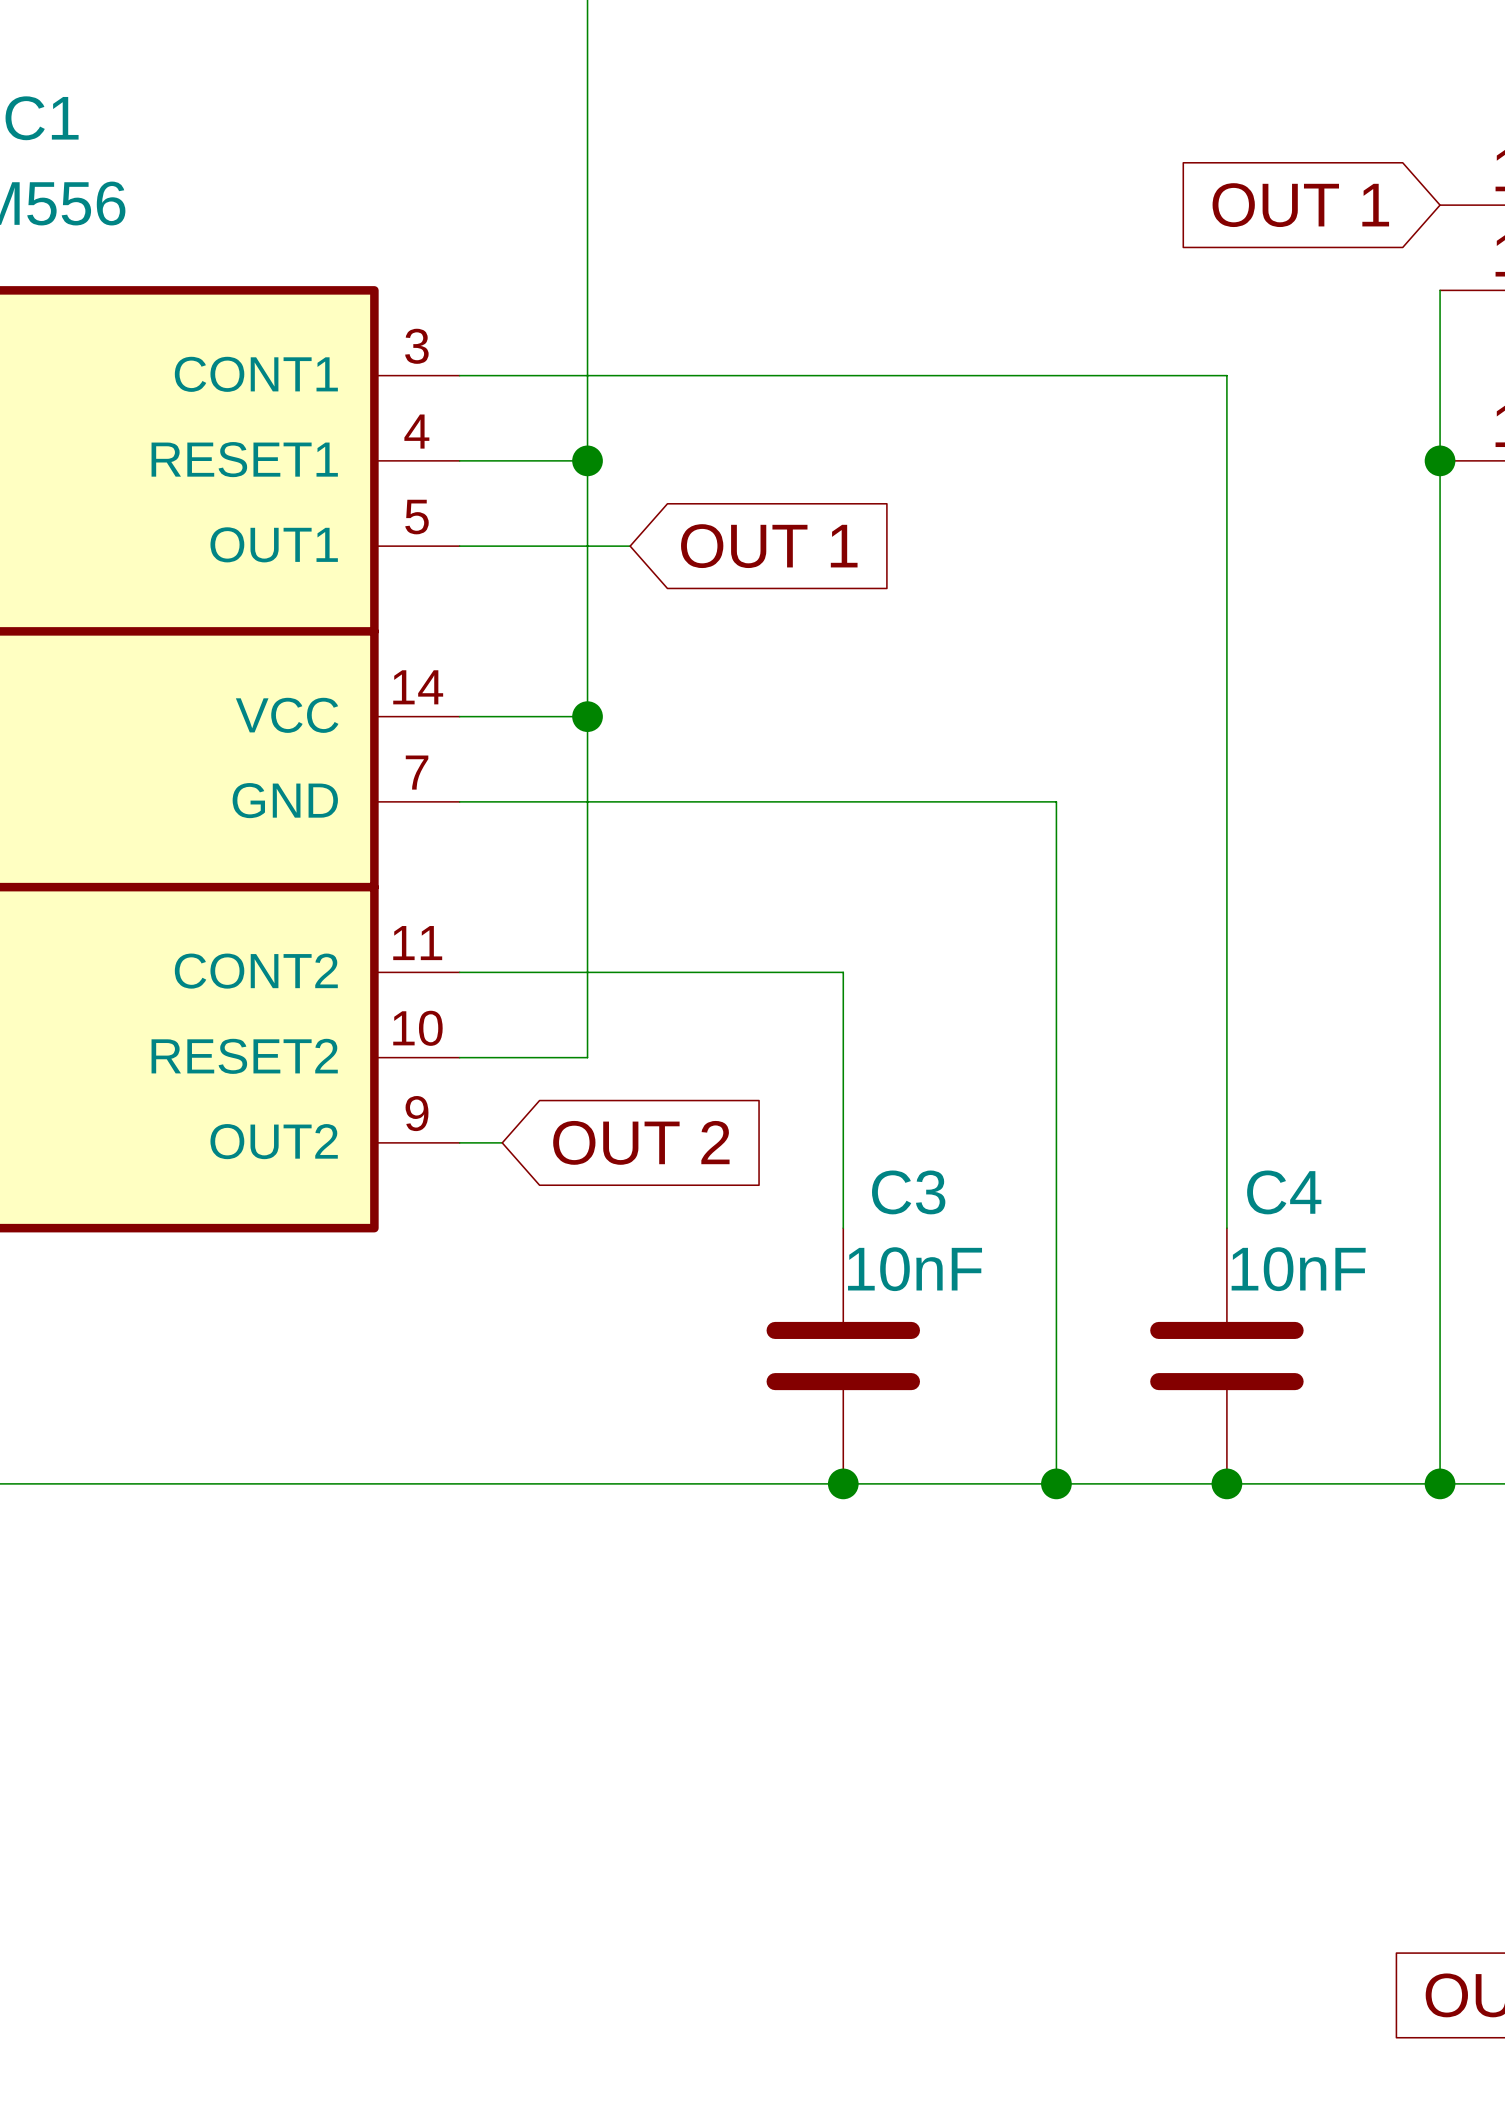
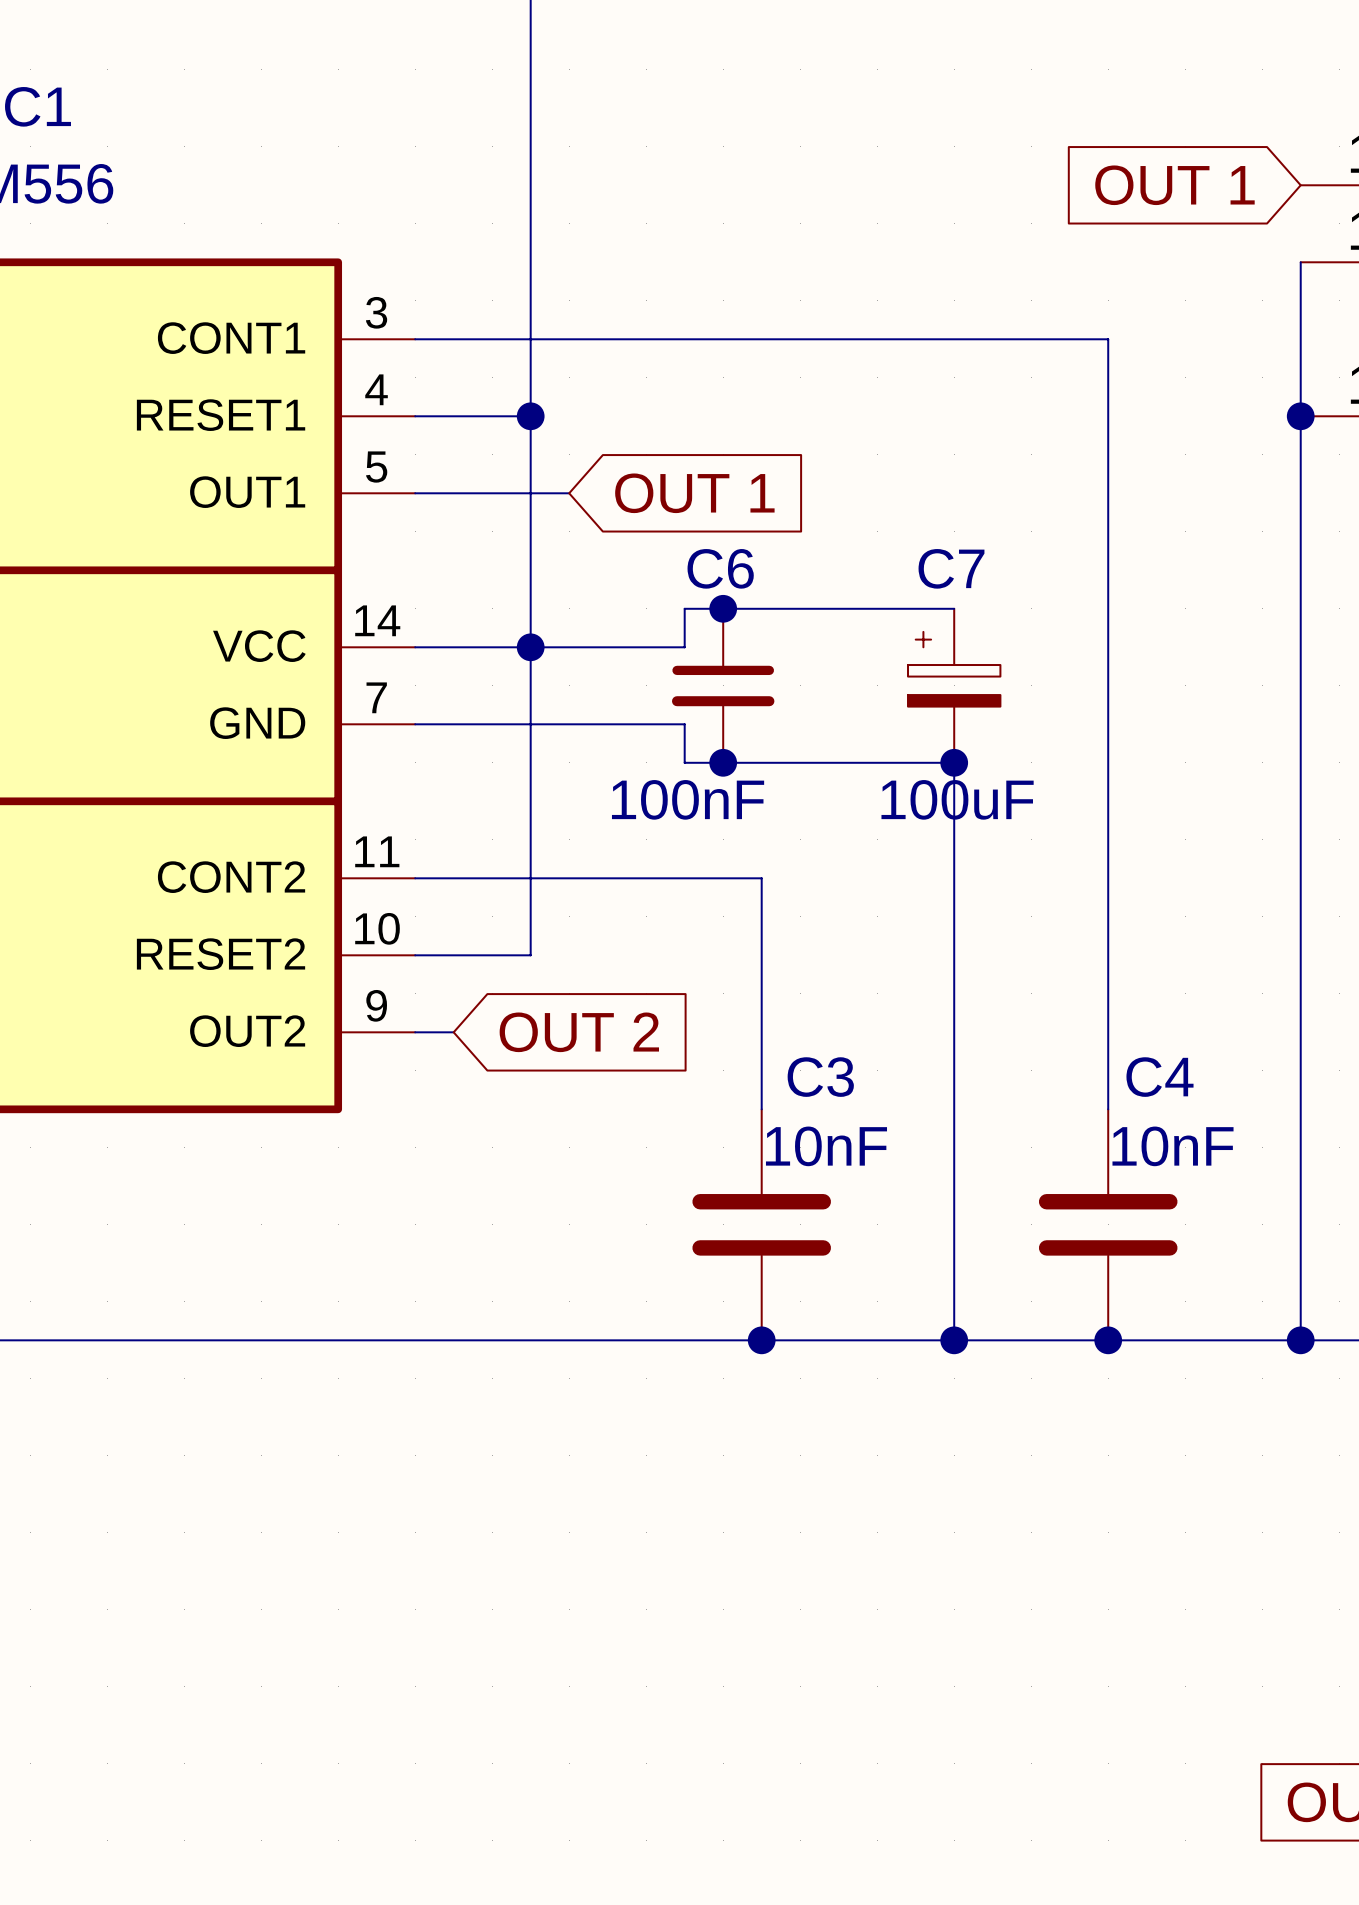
junction: none -> (723, 608)
wire: none -> (954, 608) (684, 608) (684, 647) (530, 647)
C6: none -> 100nF (723, 685)
C7: none -> 100uF (954, 685)
wire: (758, 801) (1056, 801) (1056, 844) -> (684, 724) (684, 762) (954, 762)
junction: none -> (723, 762)
junction: none -> (954, 762)

